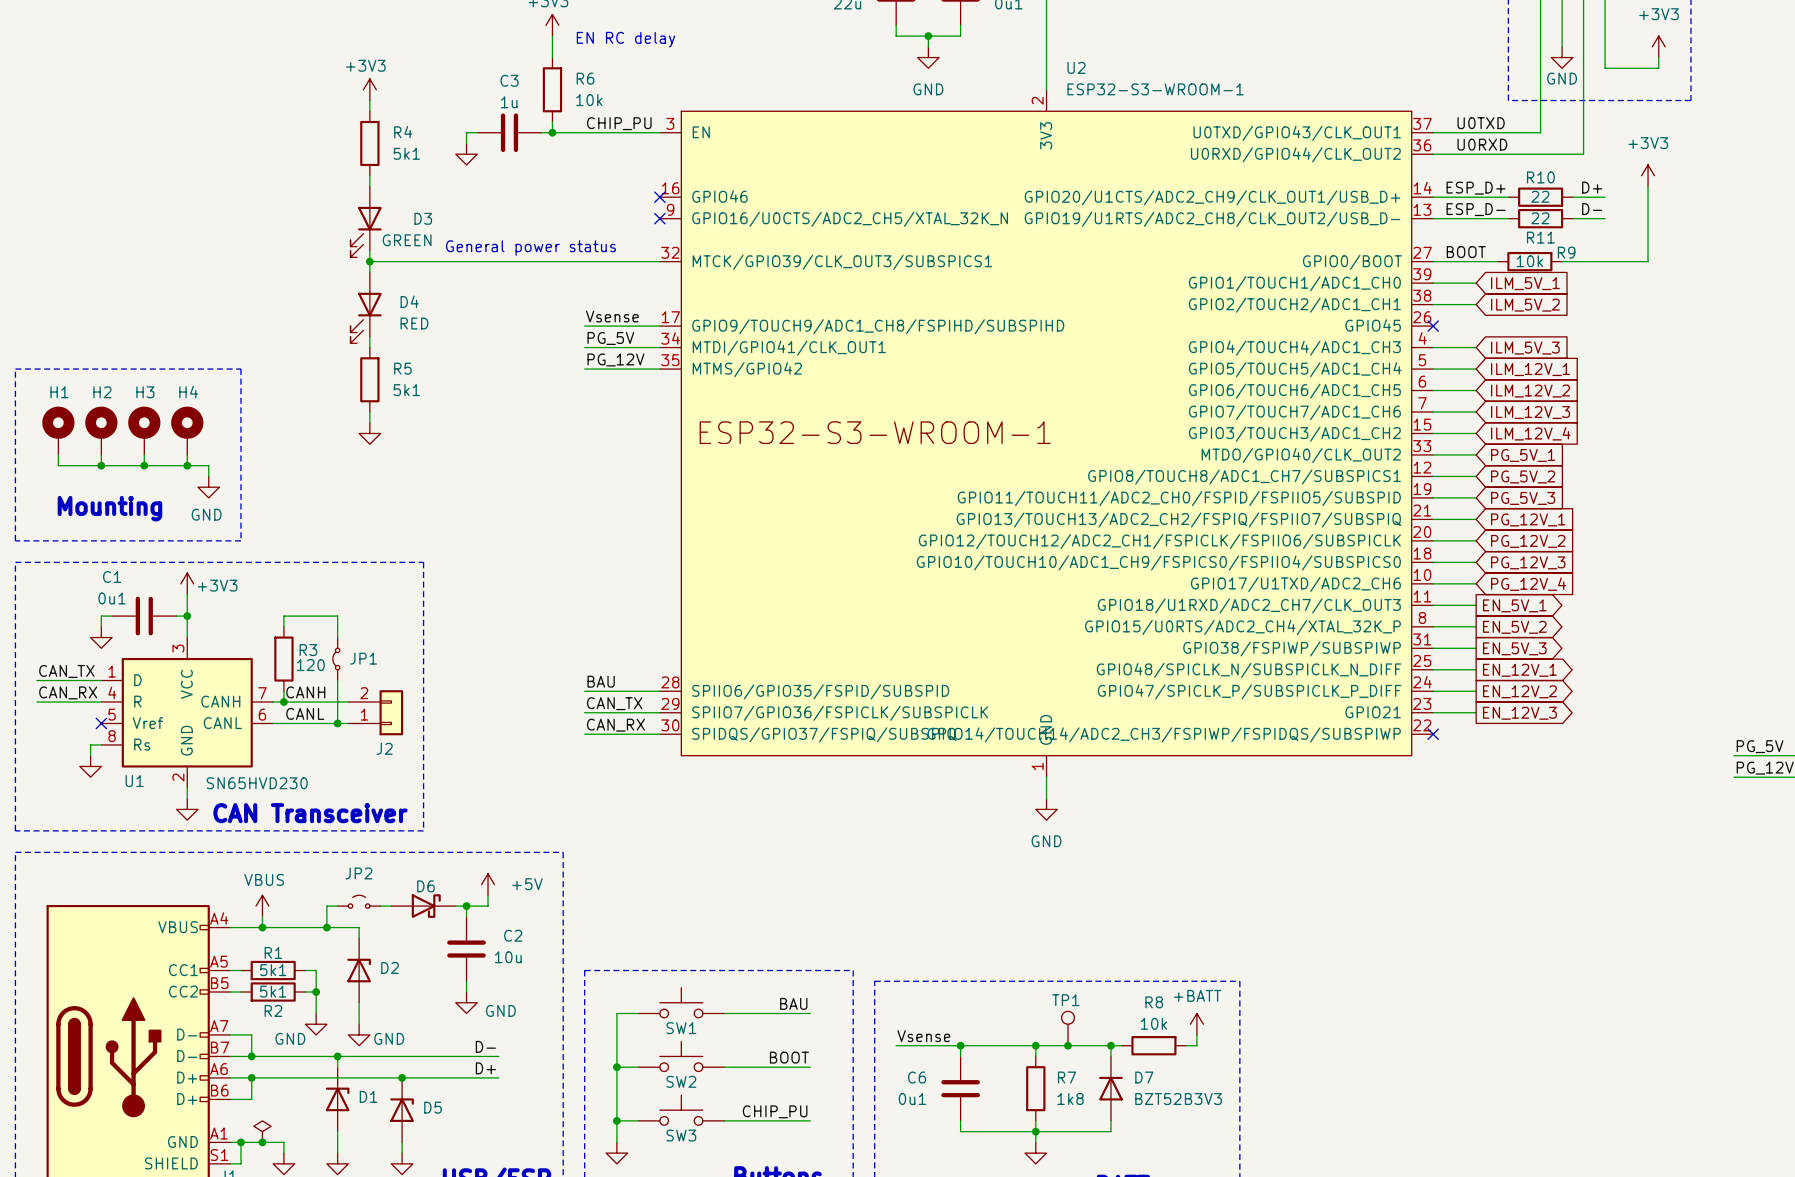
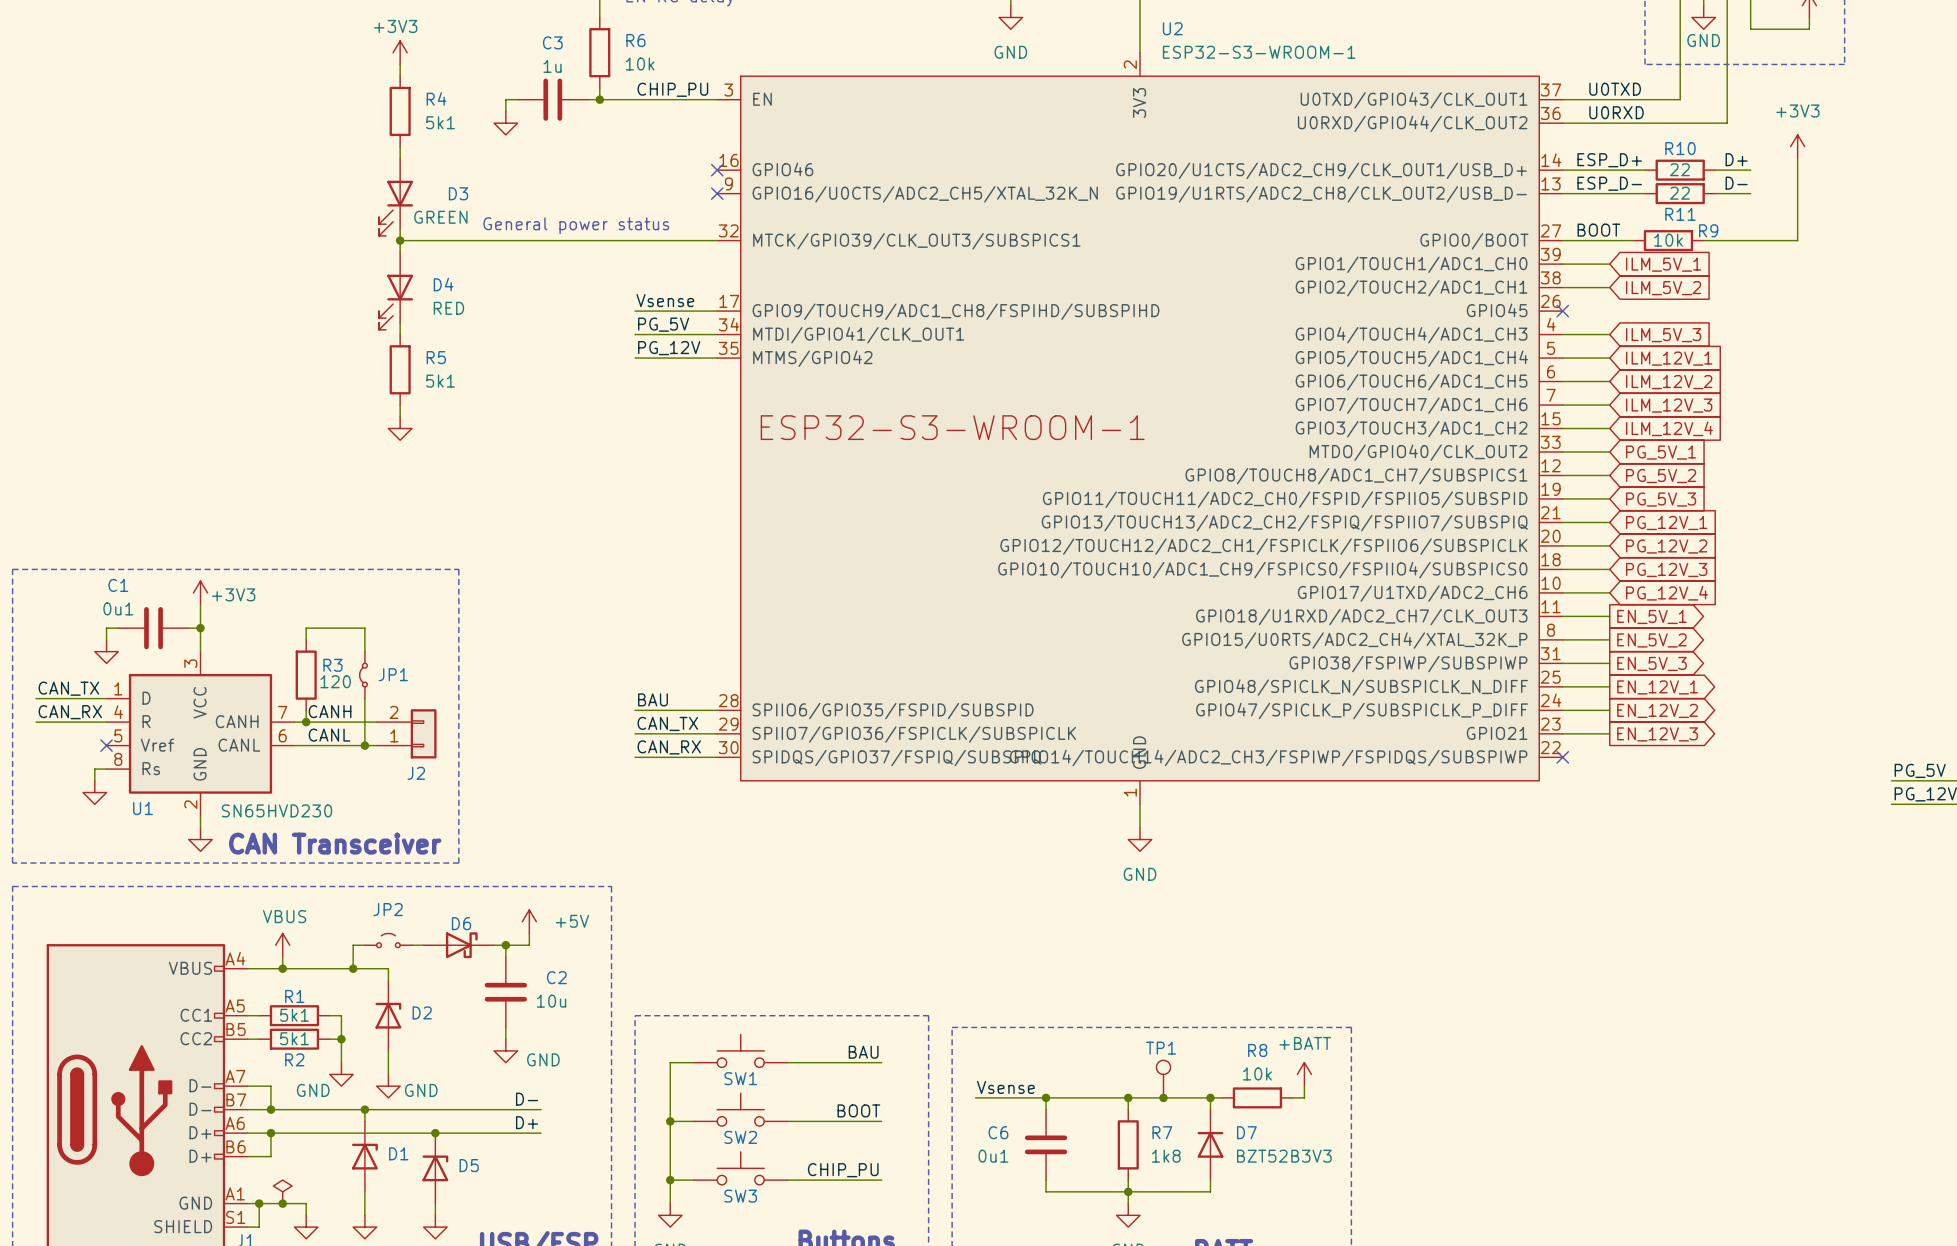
line: (15, 369) (240, 369) (240, 540) (15, 540) (15, 369) -> none
H1: (58, 430) -> none
H2: (101, 430) -> none
H3: (144, 430) -> none
H4: (187, 430) -> none
wire: (58, 454) (58, 465) (208, 465) (208, 476) -> none
wire: (101, 454) (101, 465) -> none
wire: (144, 454) (144, 465) -> none
wire: (187, 454) (187, 465) -> none
junction: (101, 465) -> none
junction: (144, 465) -> none
junction: (187, 465) -> none
power symbol: GND (208, 487) -> none
text: Mounting (109, 508) -> none

